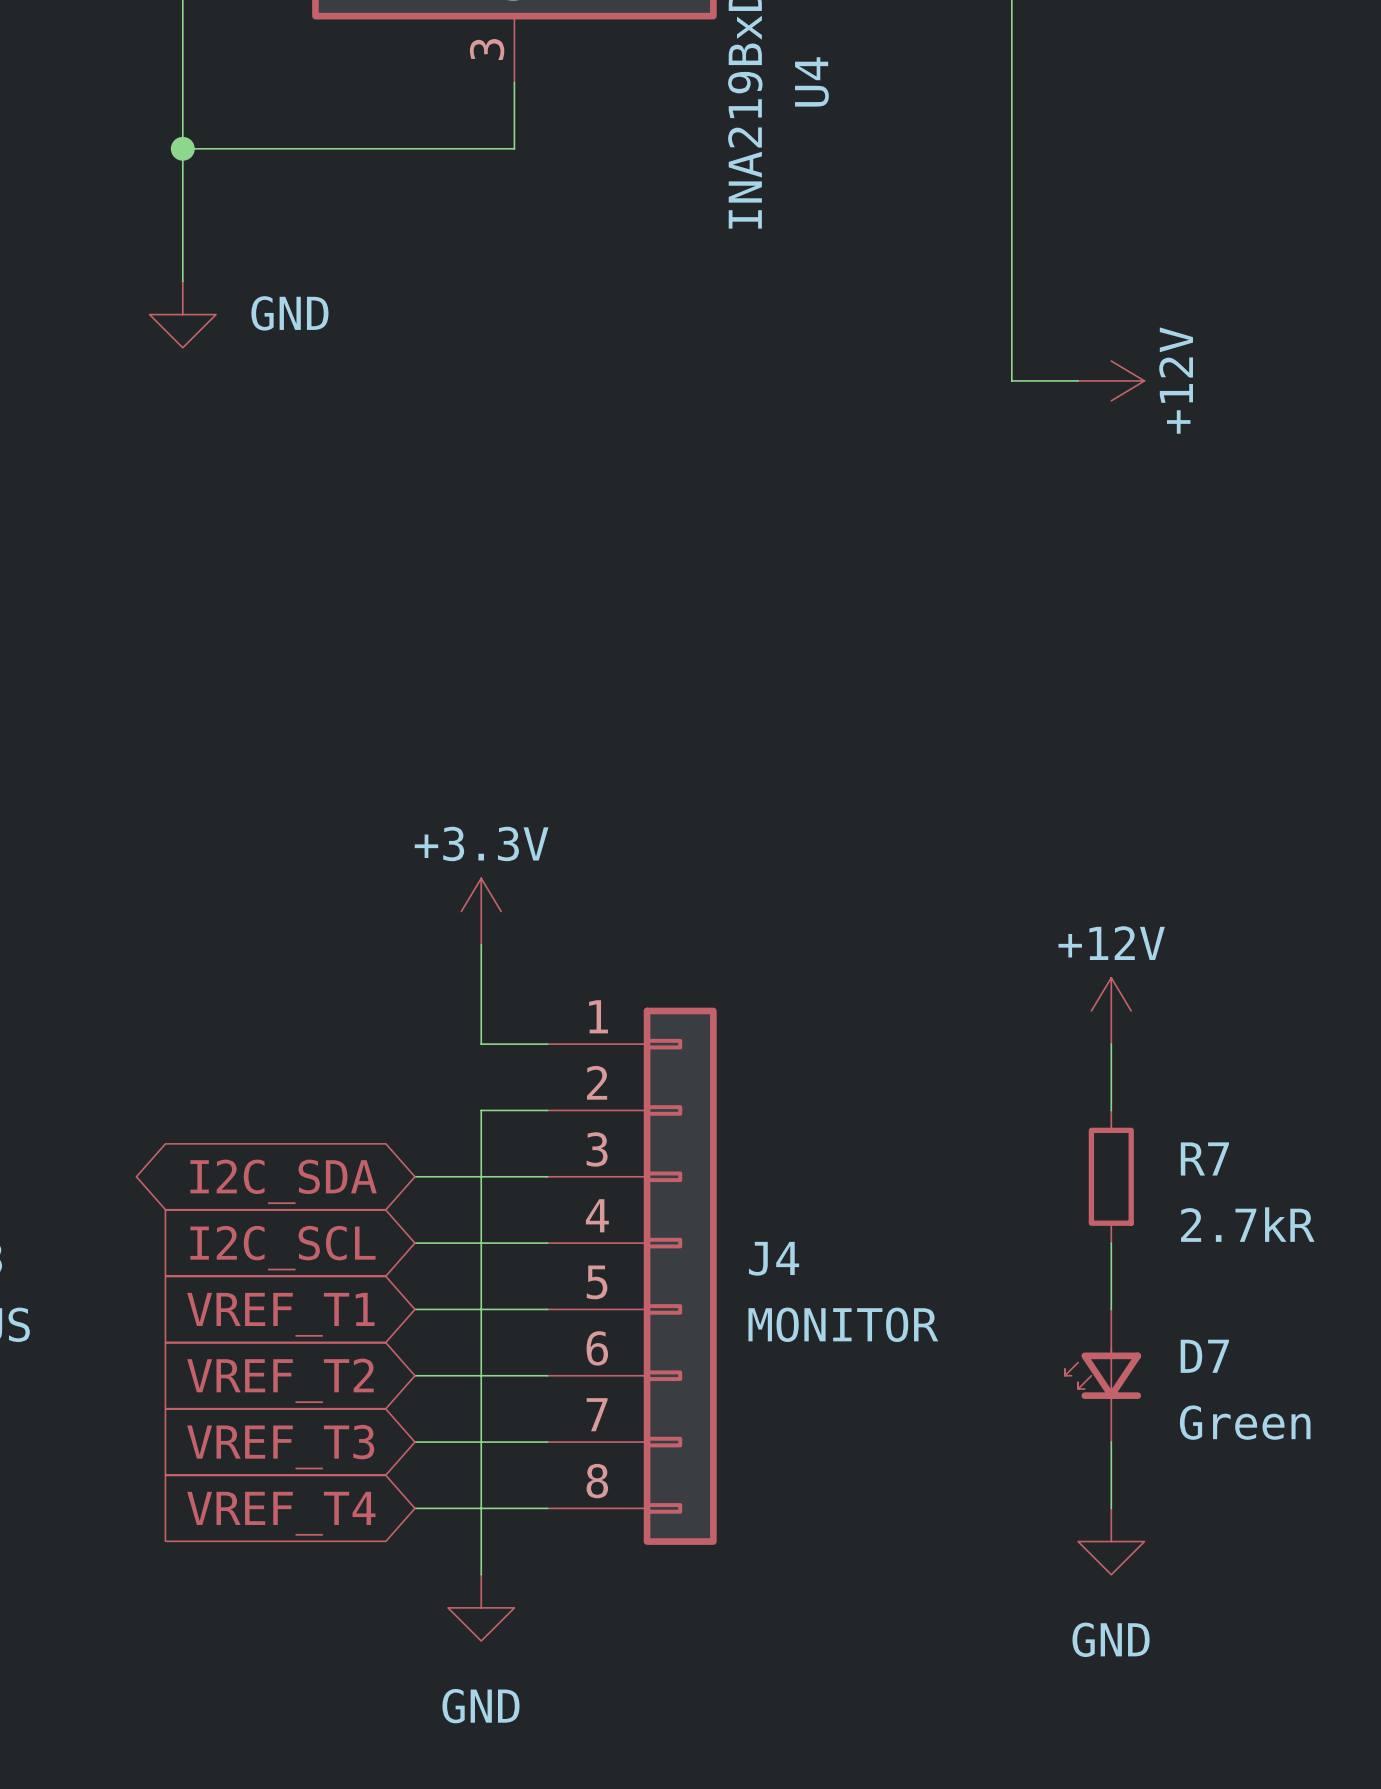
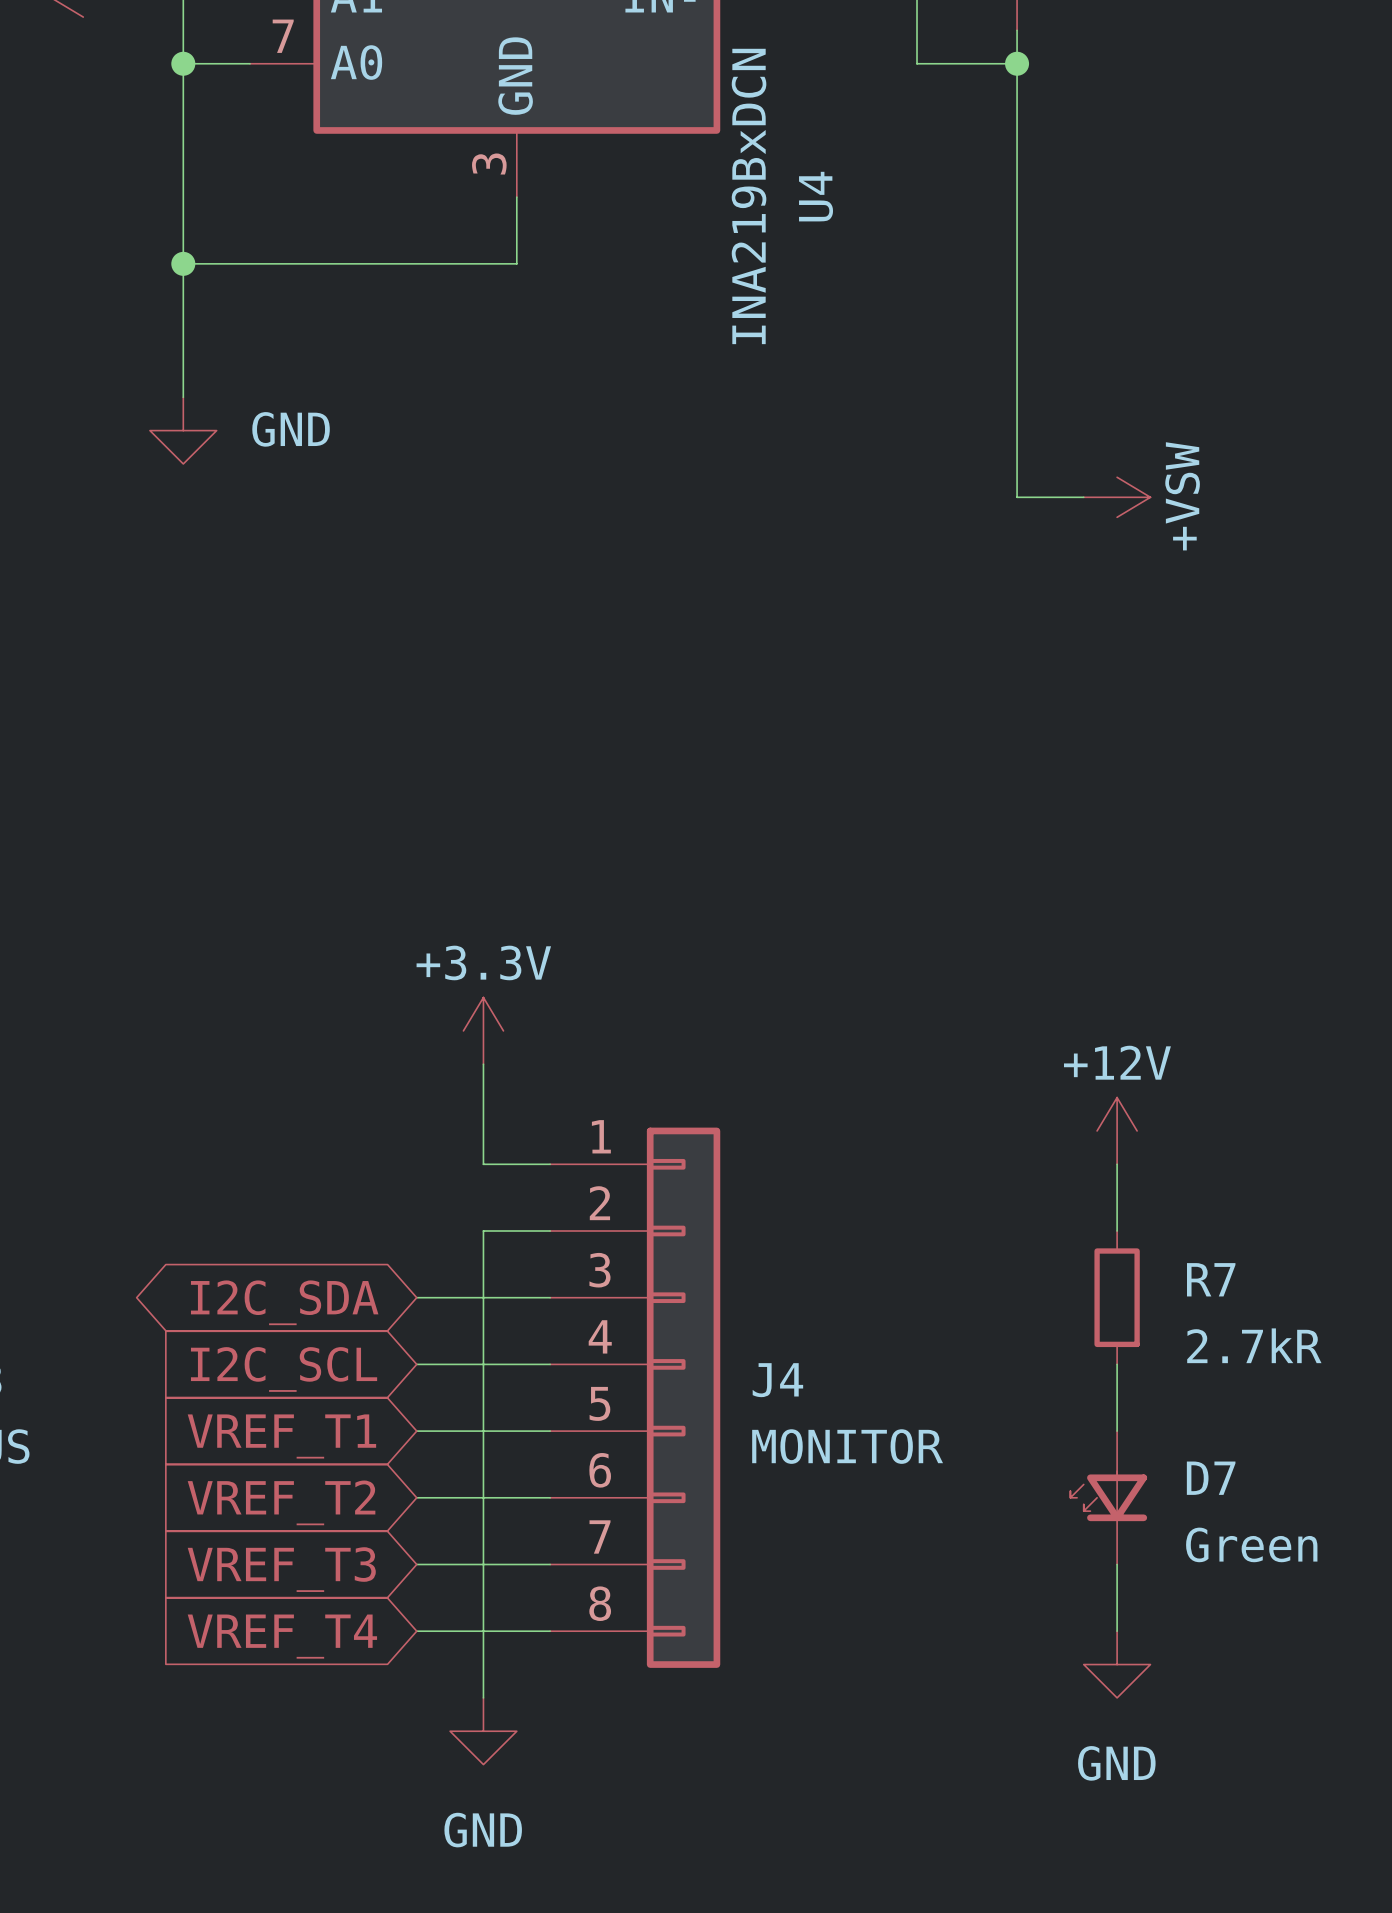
power symbol: +12V (1111, 380) -> +VSW (1117, 497)

